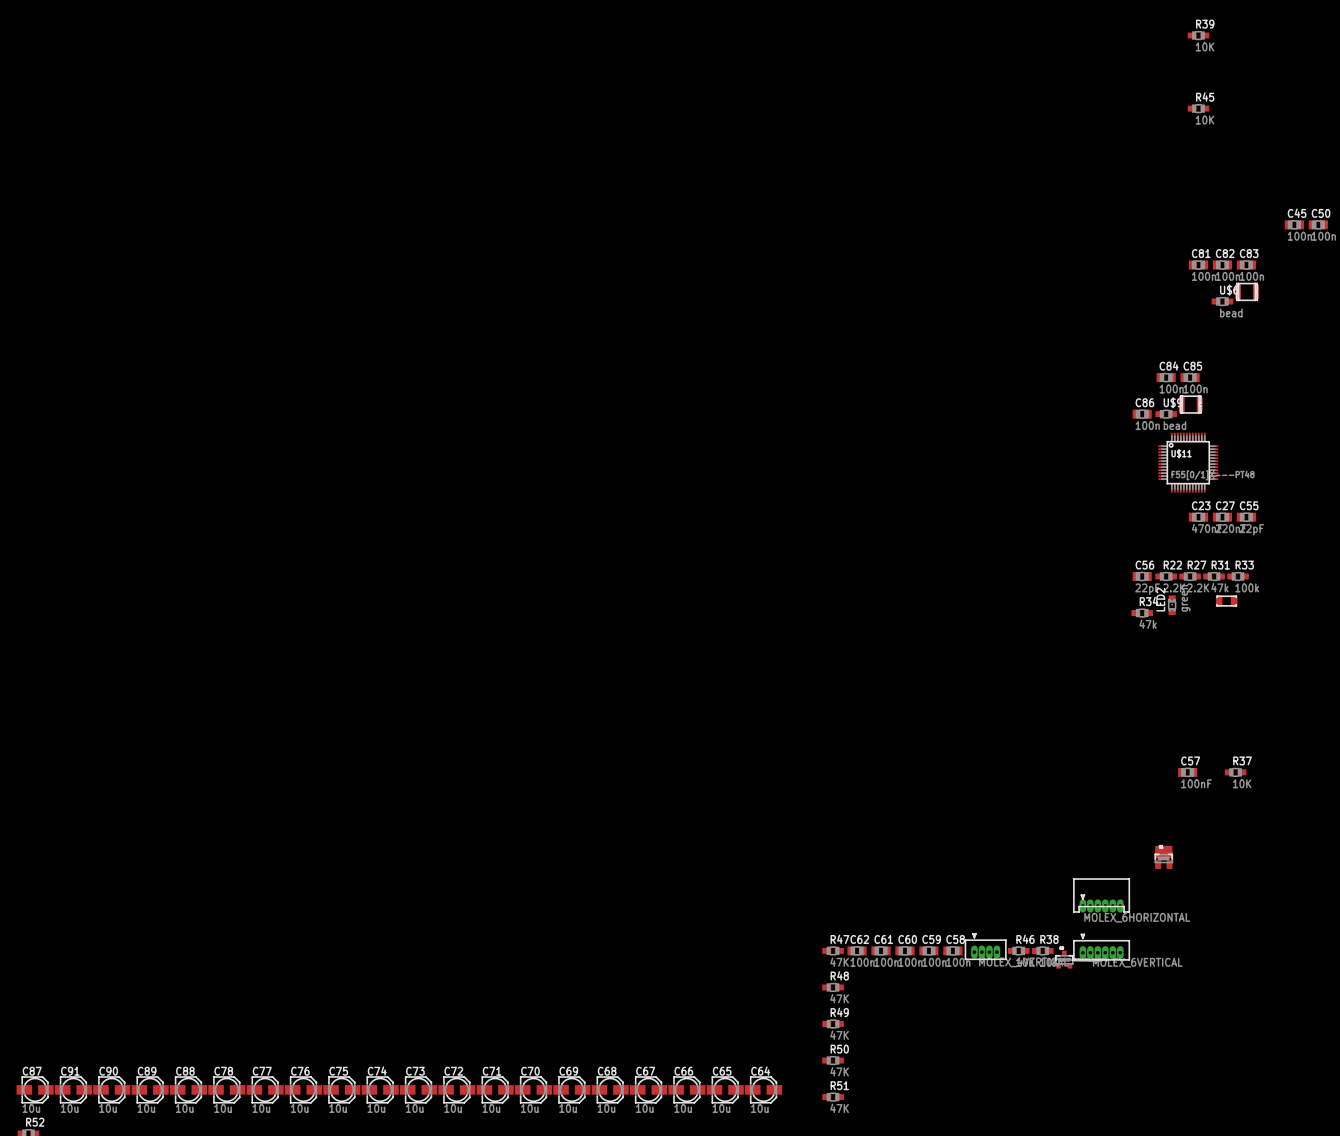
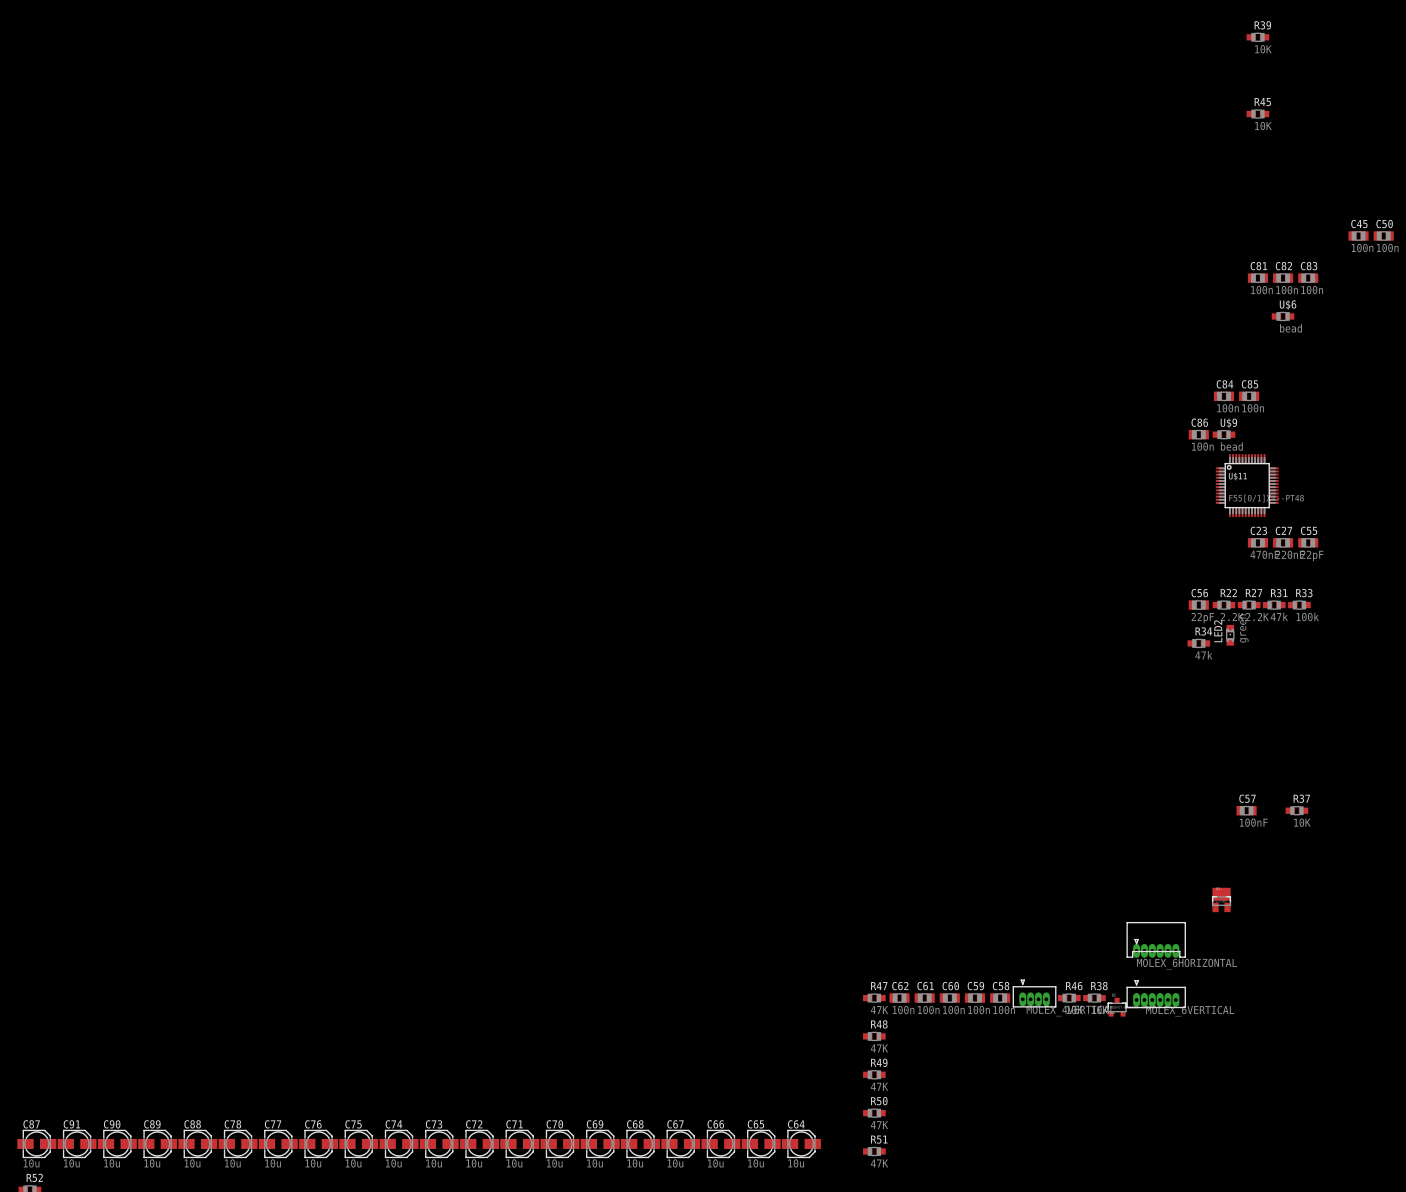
part: (1247, 291) -> none
part: (1190, 404) -> none
part: (1226, 601) -> none

